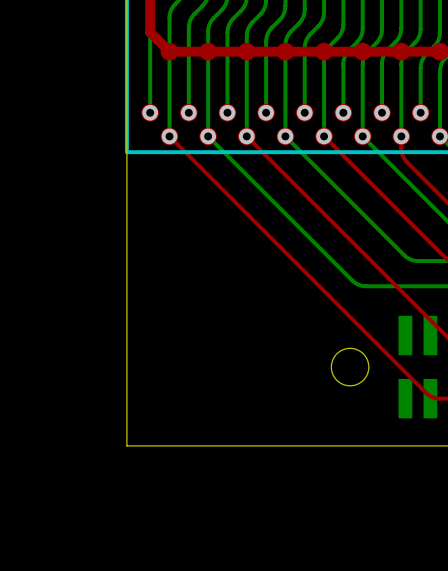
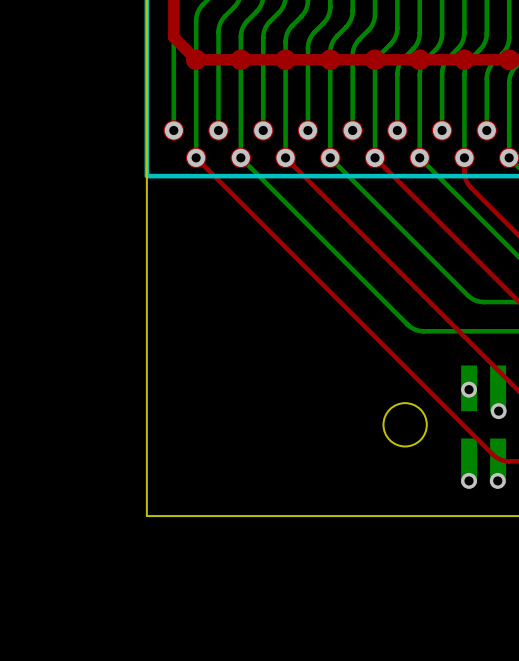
via: none -> (469, 389)
via: none -> (498, 411)
via: none -> (469, 480)
via: none -> (497, 480)

